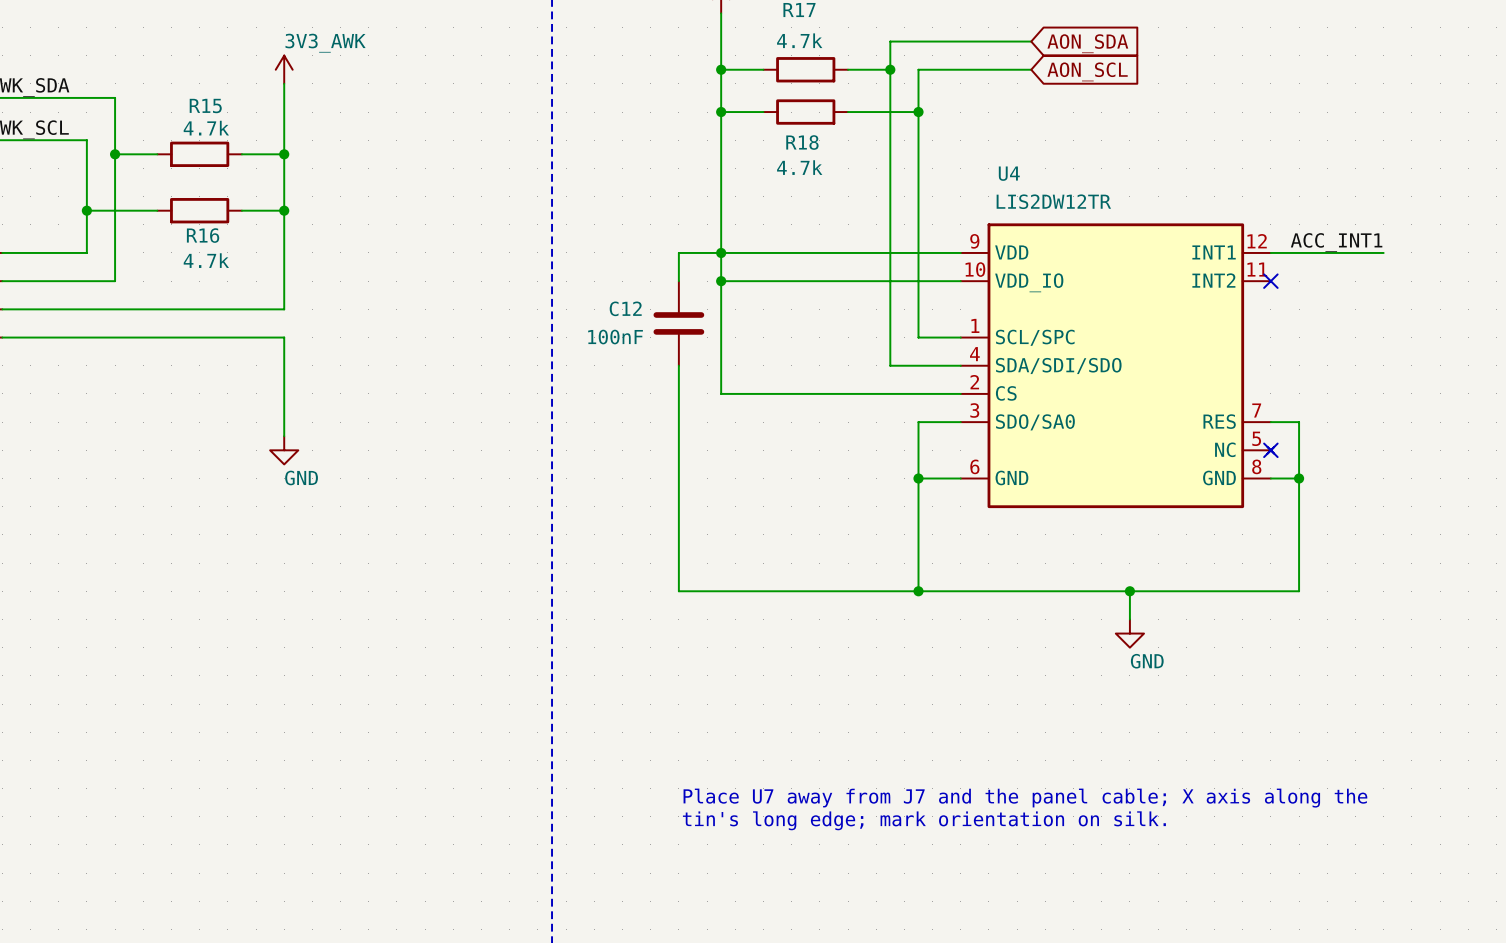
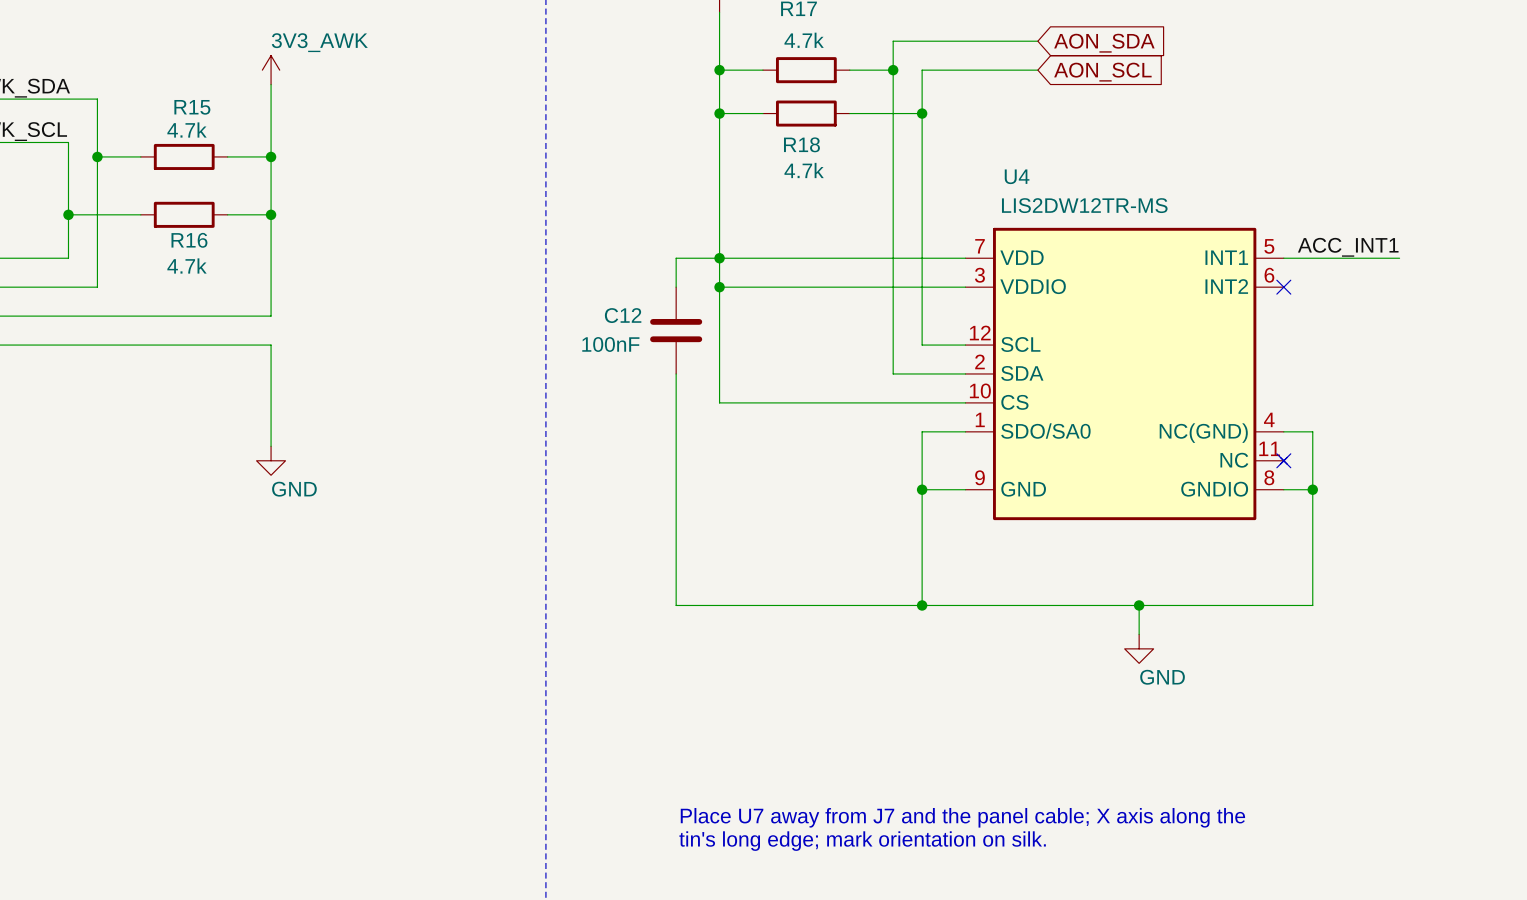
U4 value: LIS2DW12TR (1053, 201) -> LIS2DW12TR-MS (1084, 205)
U4 symbol: [960, 223, 1275, 509] -> [965, 227, 1288, 521]

